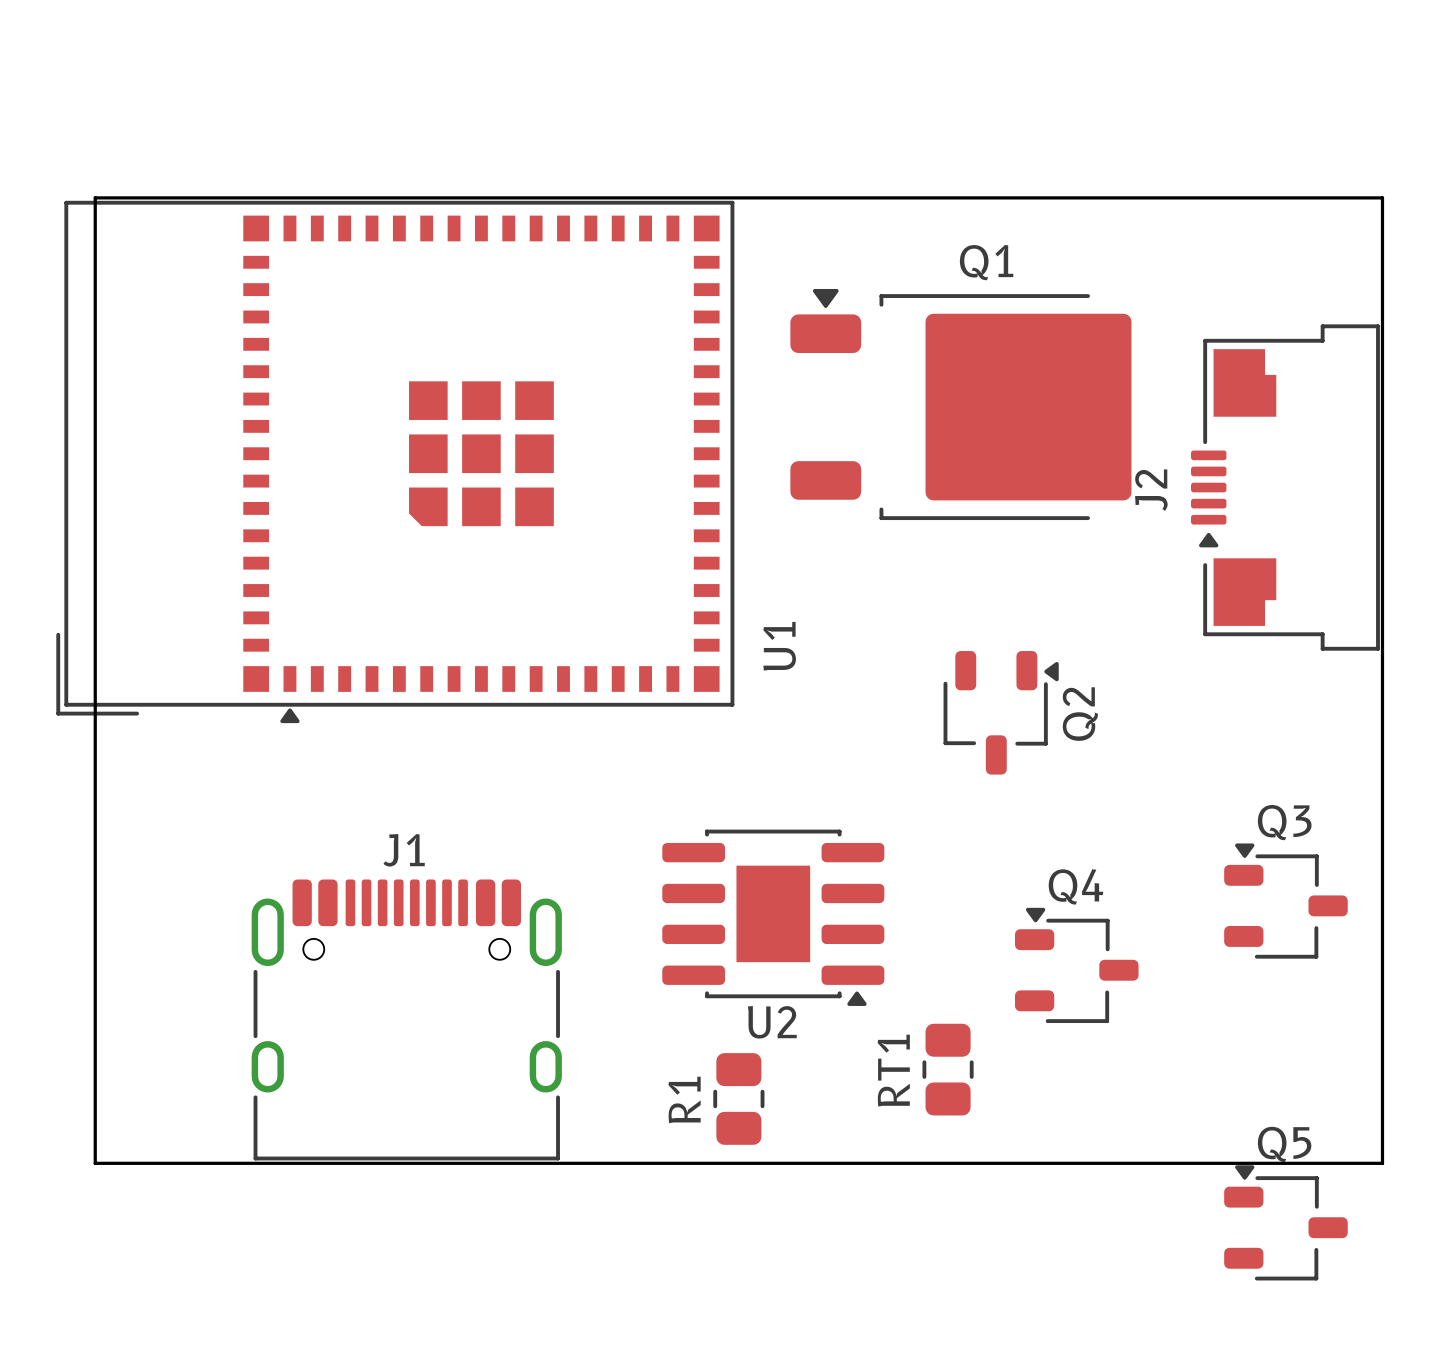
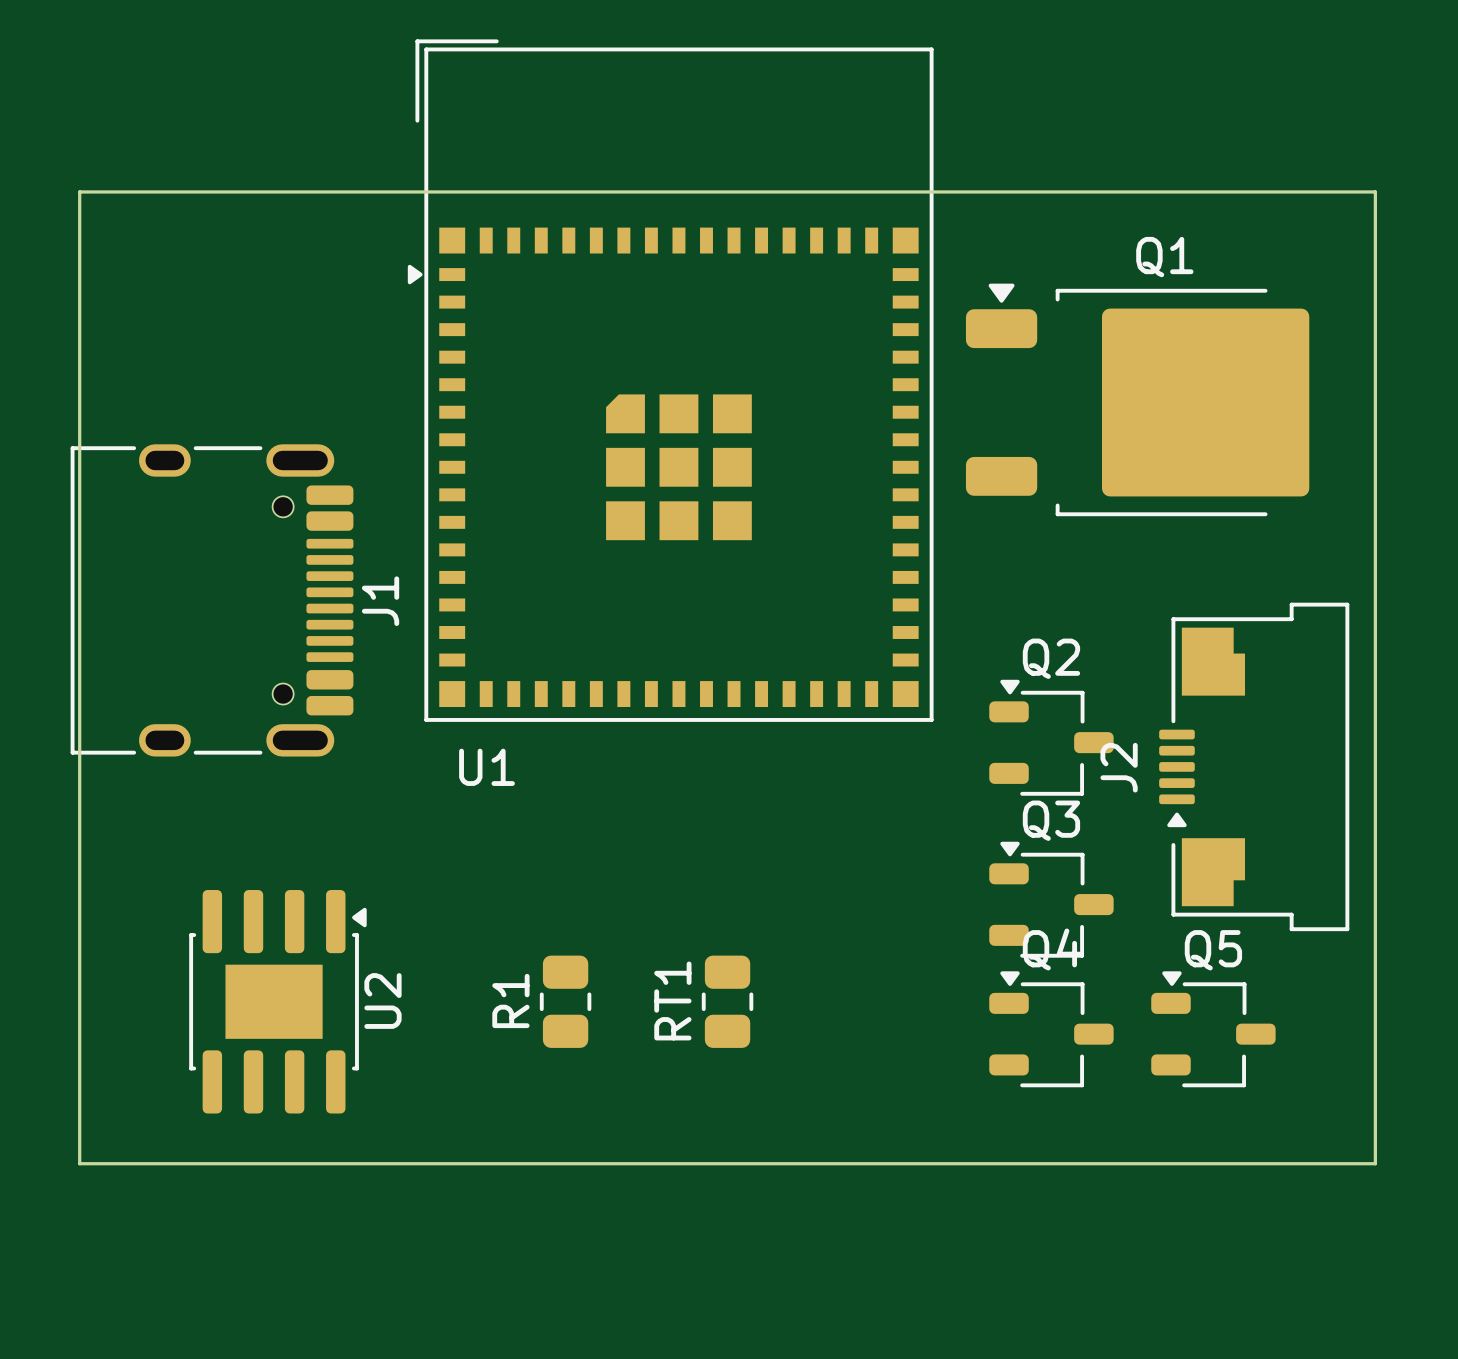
Q1 position: (960, 404) -> (1137, 399)
U1 rotation: 0° (395, 461) -> 90° clockwise (670, 380)
J2 position: (1285, 487) -> (1254, 766)
Q2 rotation: 0° (1001, 712) -> 90° counterclockwise (1051, 737)
Q3 position: (1285, 901) -> (1051, 899)
U2 rotation: 0° (773, 917) -> 90° counterclockwise (277, 1001)
U2 position: (773, 917) -> (277, 1001)
Q4 position: (1076, 965) -> (1051, 1029)
J1 rotation: 0° (406, 1019) -> 90° clockwise (212, 600)
J1 position: (406, 1019) -> (212, 600)
RT1 position: (948, 1069) -> (727, 1001)
R1 position: (738, 1098) -> (565, 1001)
Q5 position: (1285, 1222) -> (1213, 1029)

